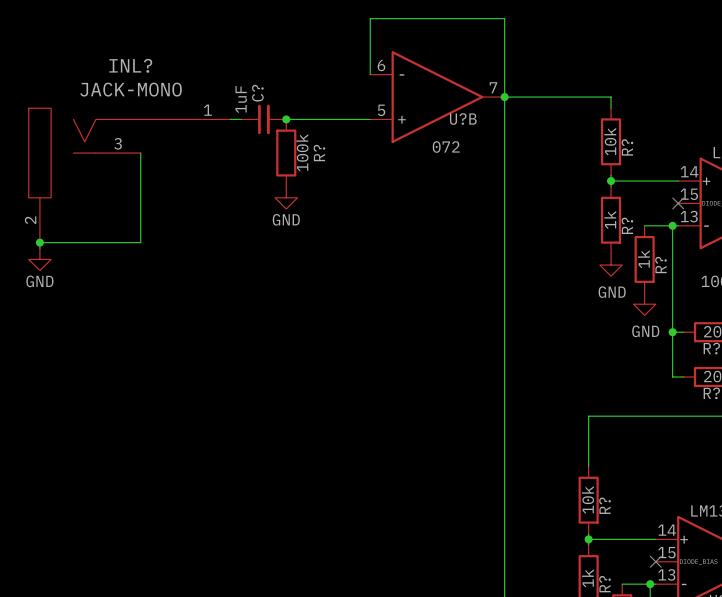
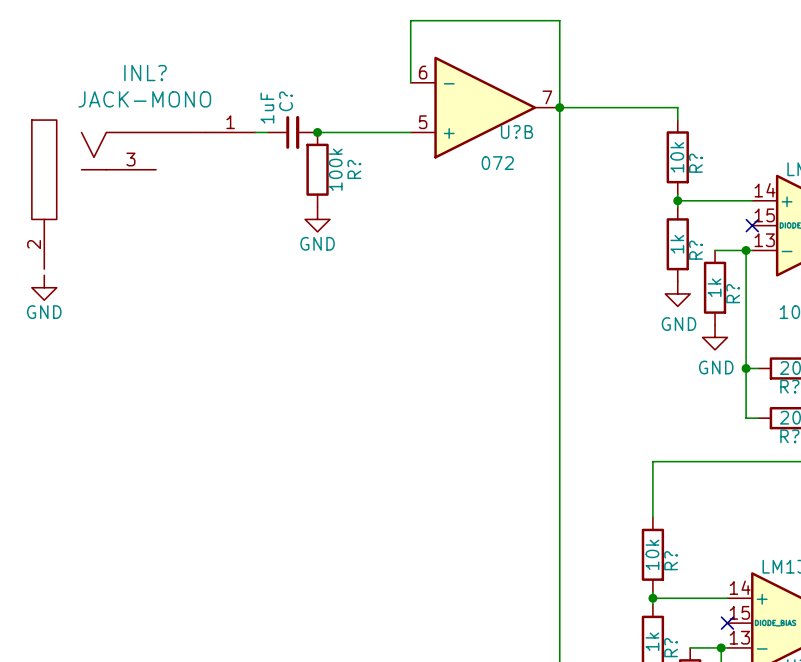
wire: (140, 153) (140, 242) (39, 242) (39, 248) -> none
junction: (39, 242) -> none

